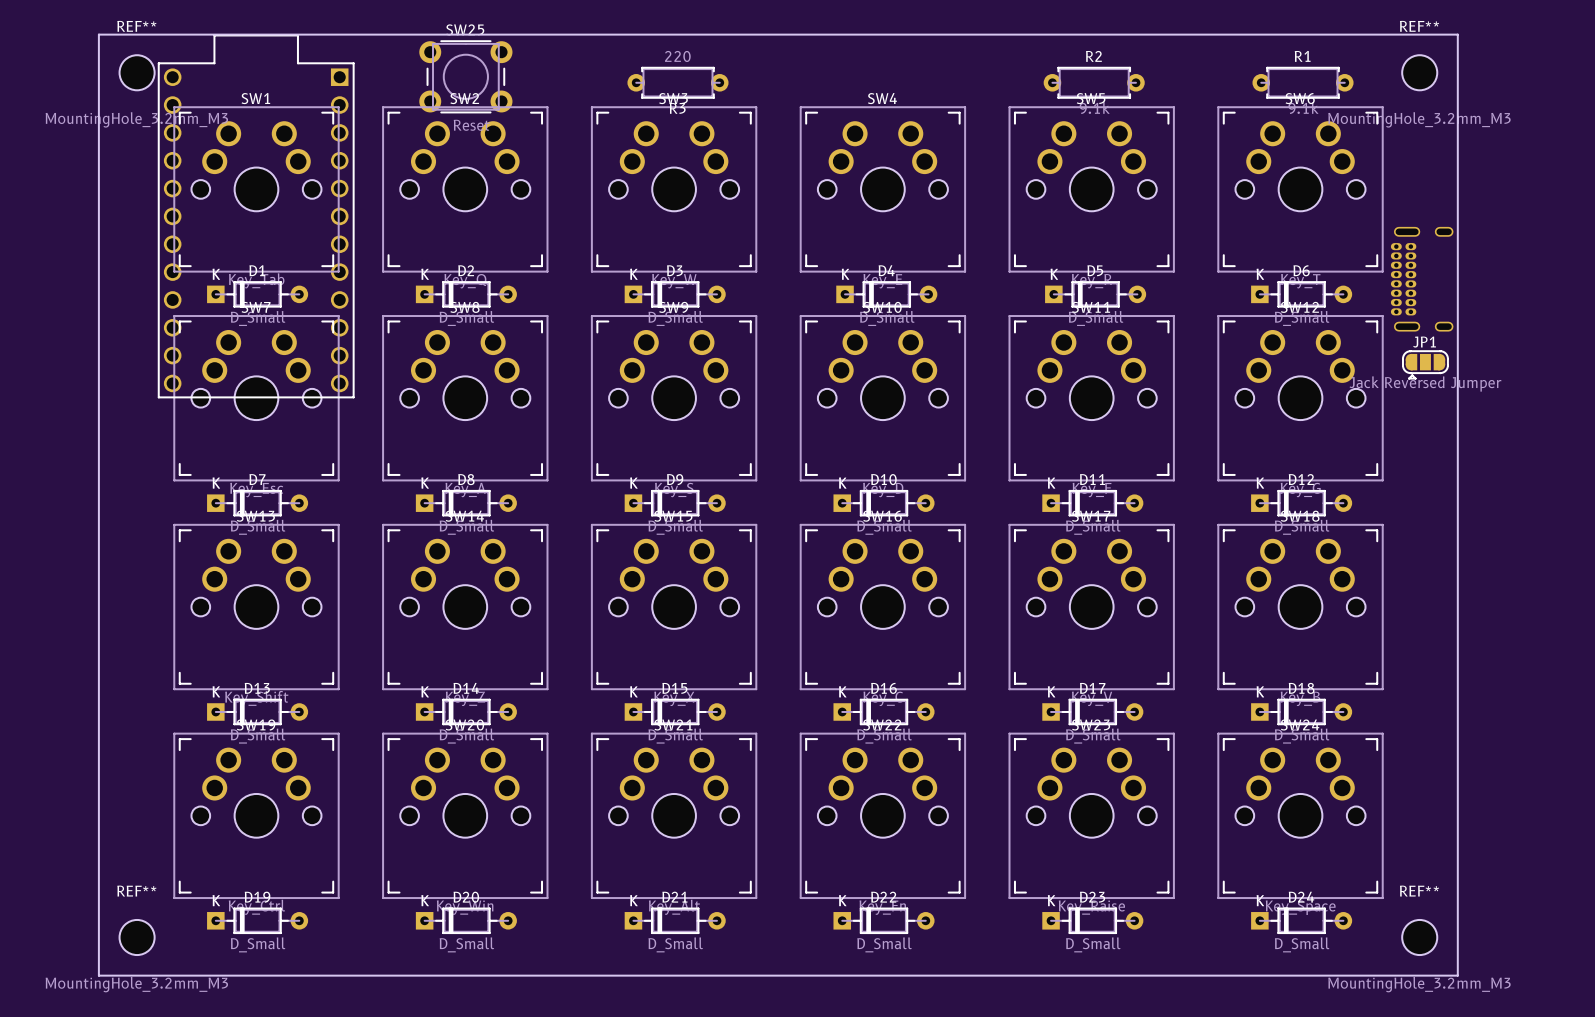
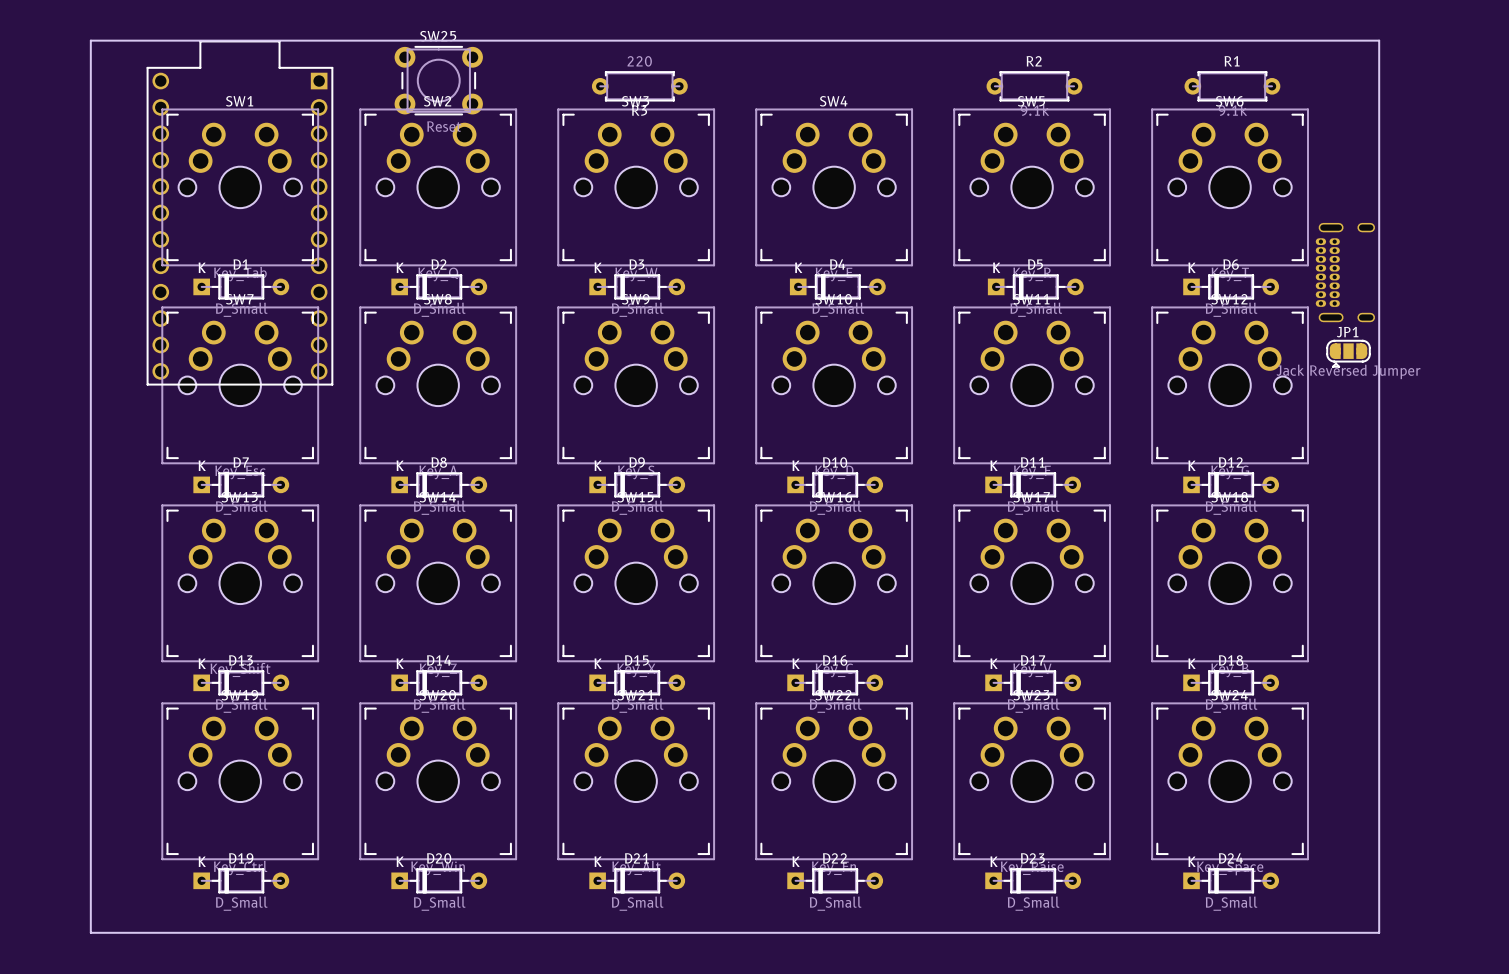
REF**: MountingHole_3.2mm_M3 (137, 72) -> none
REF**: MountingHole_3.2mm_M3 (1419, 72) -> none
REF**: MountingHole_3.2mm_M3 (137, 937) -> none
REF**: MountingHole_3.2mm_M3 (1419, 937) -> none

